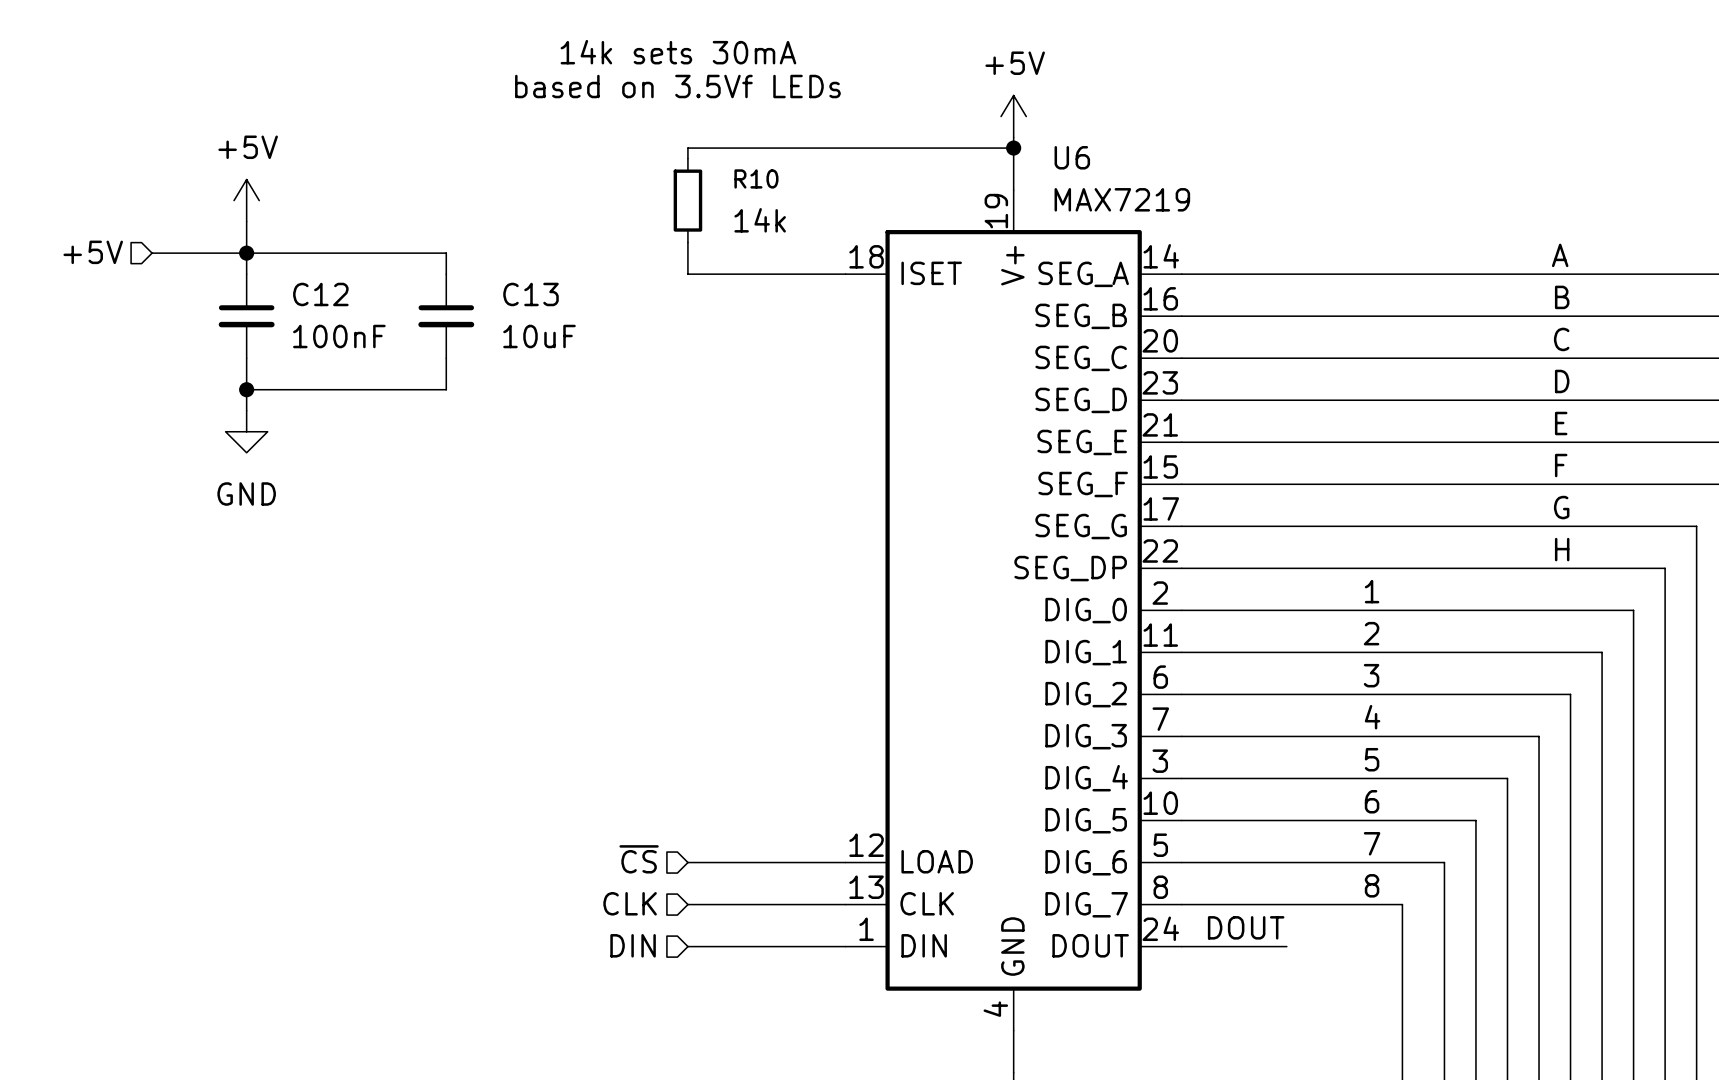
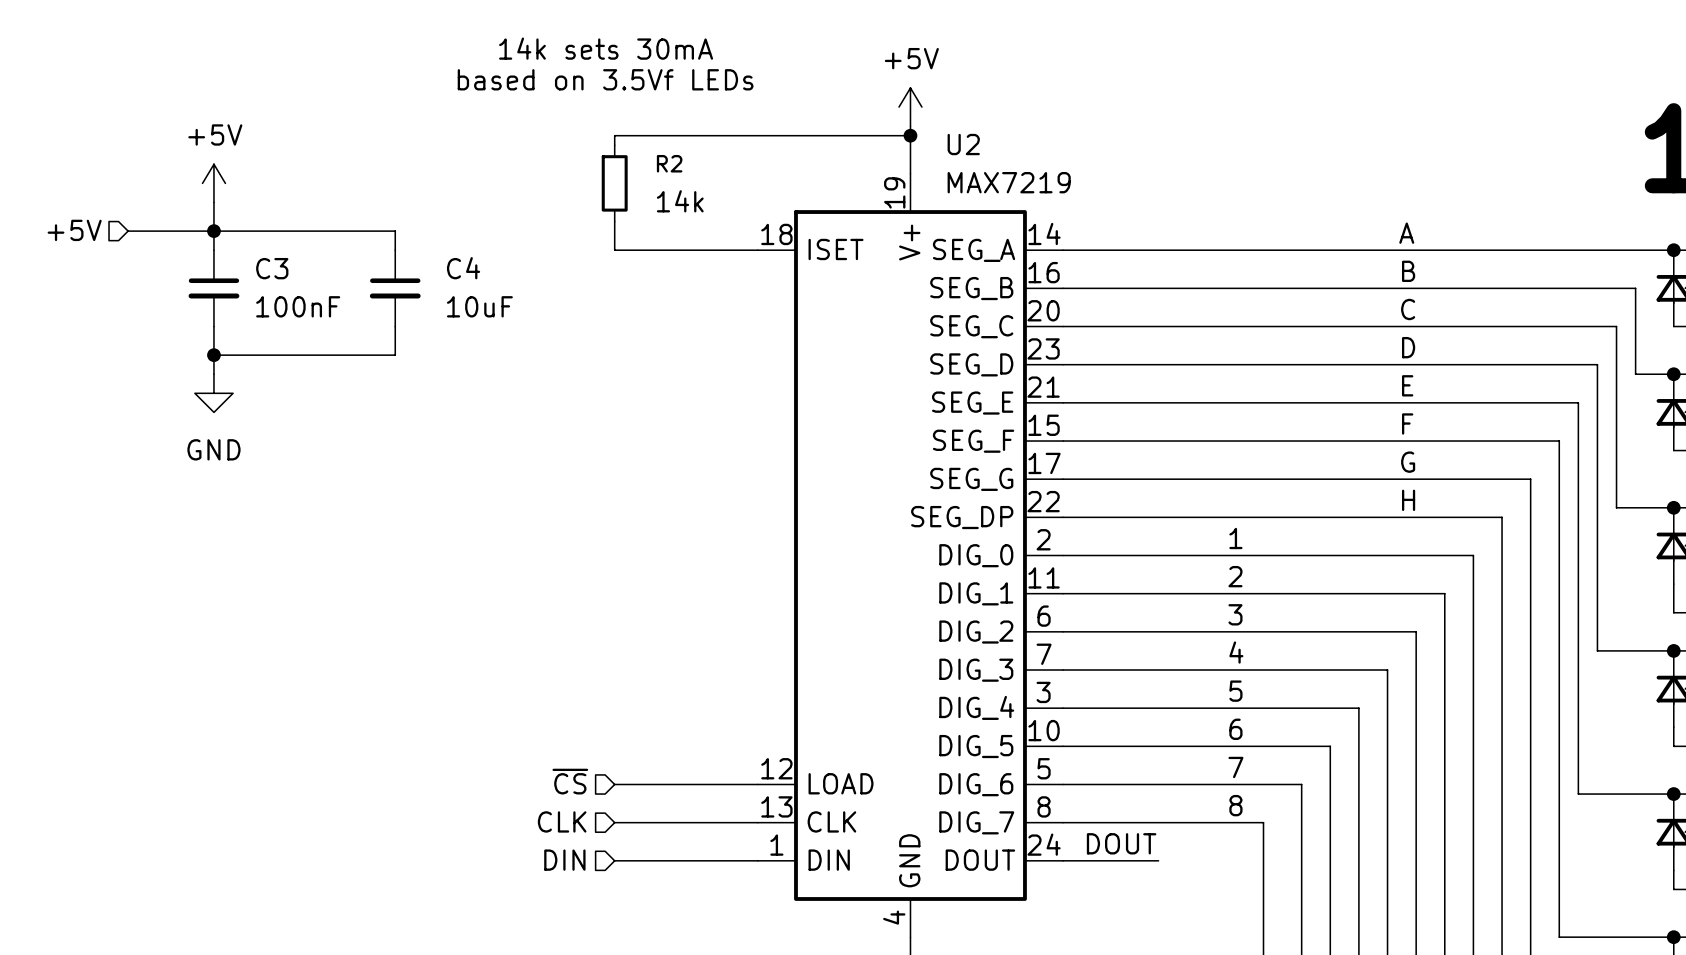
U6 name: U6 (1072, 157) -> U2 (963, 144)
R10 name: R10 (756, 178) -> R2 (669, 163)
C12 name: C12 (320, 294) -> C3 (272, 268)
C13 name: C13 (530, 294) -> C4 (463, 268)

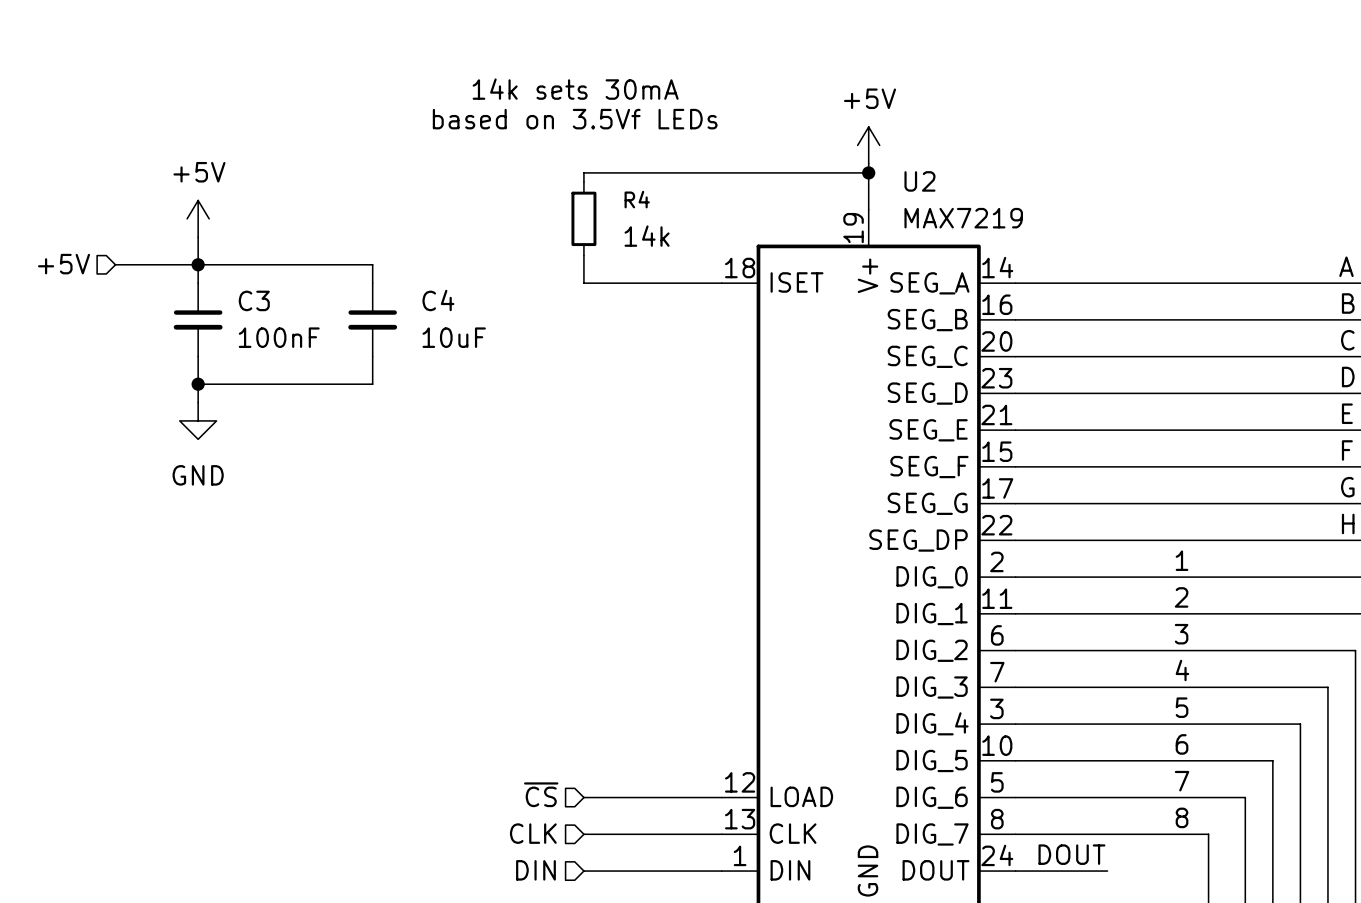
R2 name: R2 (669, 163) -> R4 (637, 199)

